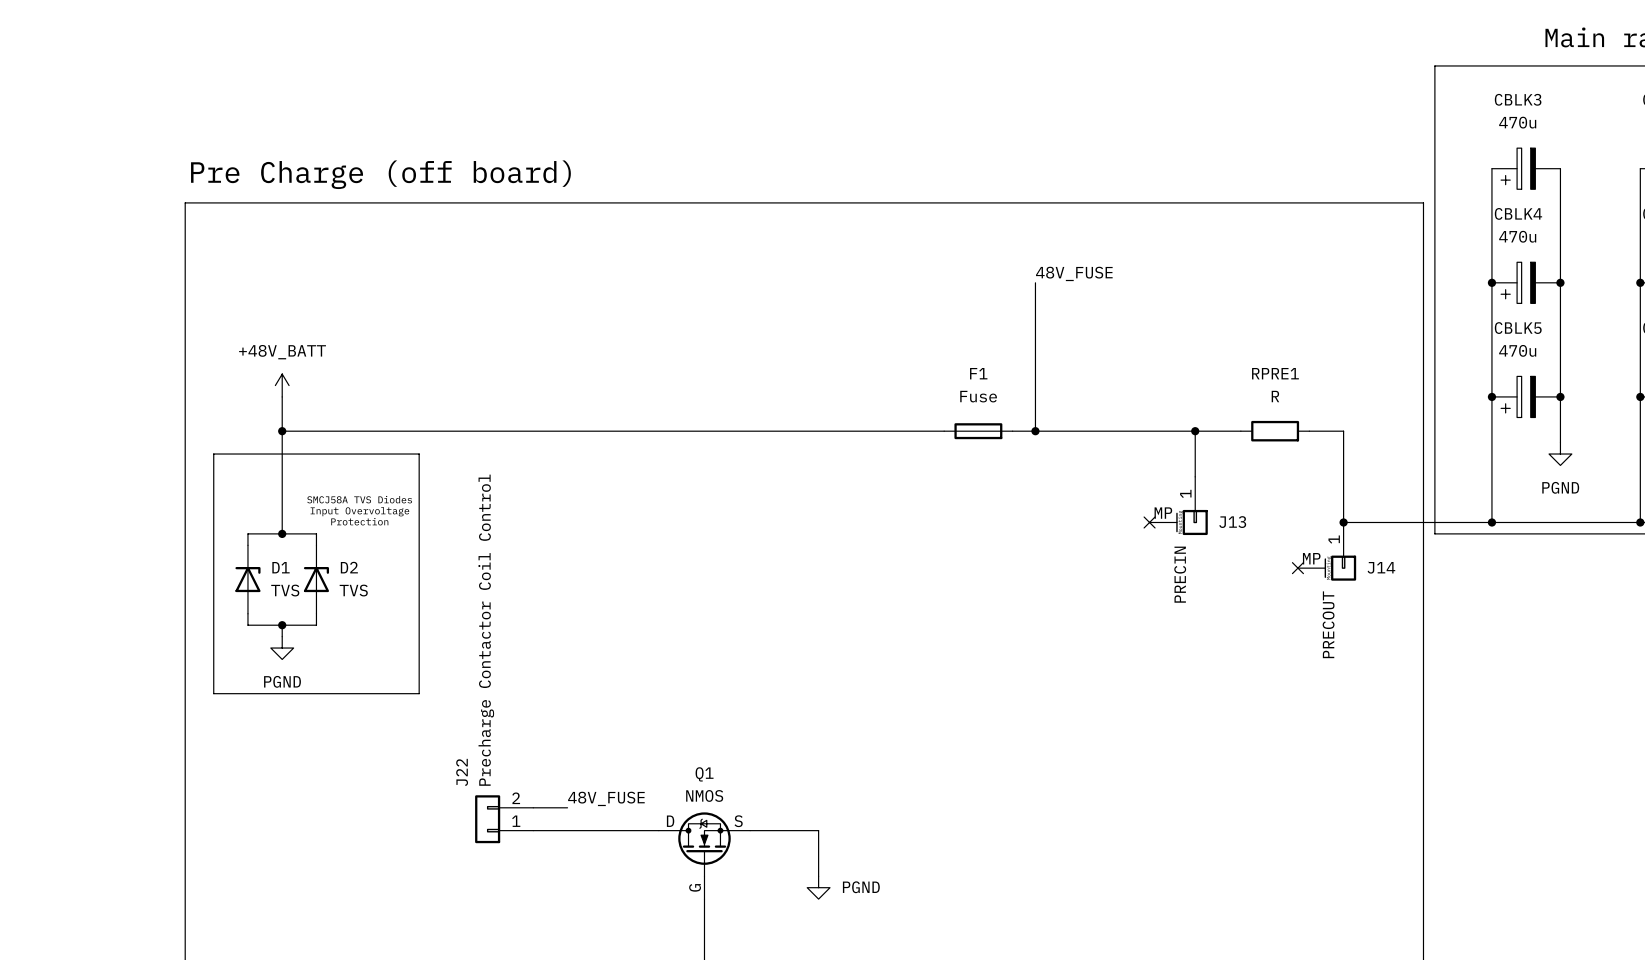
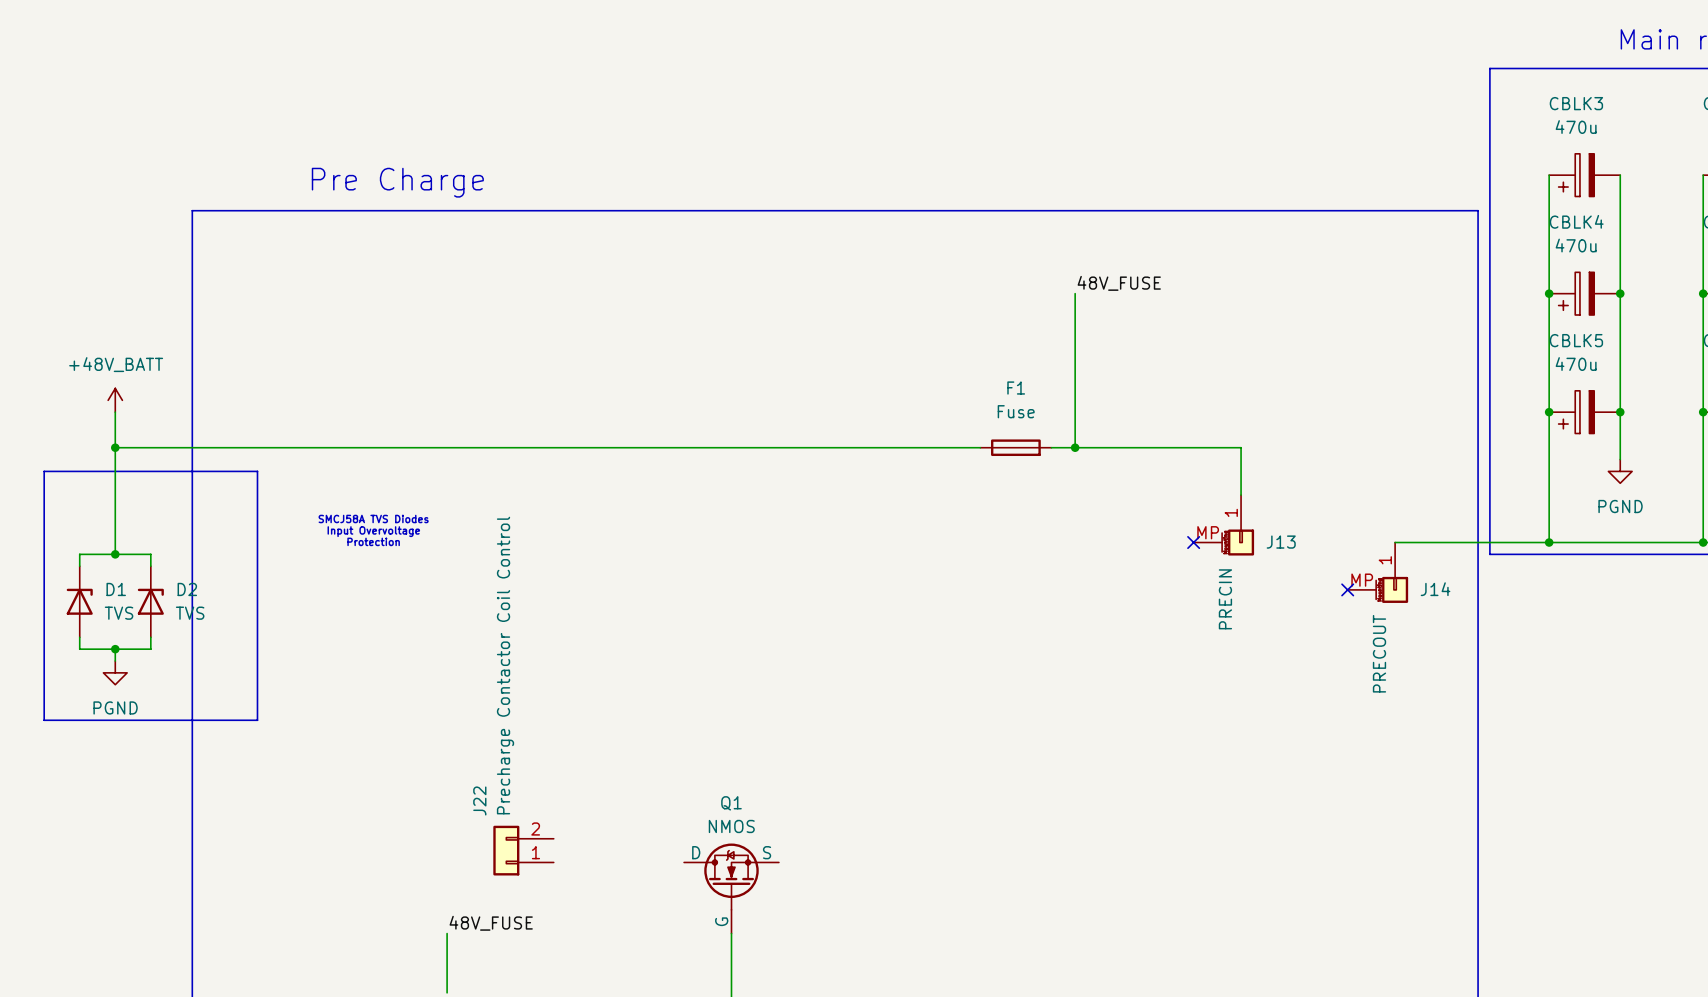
text: Pre Charge (off board) (380, 174) -> Pre Charge (397, 182)
power symbol position: +48V_BATT (282, 385) -> +48V_BATT (115, 400)
wire: (282, 396) (282, 533) -> (115, 412) (115, 554)
wire: none -> (115, 447) (293, 447)
junction: none -> (115, 447)
junction: (282, 431) -> none
wire: (1195, 431) (1240, 431) -> none
junction: (1195, 431) -> none
RPRE1: R (1275, 431) -> none
wire: (1309, 431) (1343, 431) (1343, 522) -> none
line: (213, 454) (213, 693) -> (221, 471) (44, 471) (44, 720) (221, 720)
line: (247, 454) (419, 454) (419, 693) (247, 693) -> (257, 471) (257, 720)
junction: (1343, 522) -> none
junction: none -> (115, 554)
junction: (282, 533) -> none
wire: (247, 545) (247, 533) (316, 533) (316, 545) -> (79, 566) (79, 554) (150, 554) (150, 566)
D1 position: (247, 579) -> (79, 601)
D2 position: (316, 579) -> (150, 601)
wire: (247, 613) (247, 625) (316, 625) (316, 613) -> (79, 637) (79, 649) (150, 649) (150, 637)
junction: none -> (115, 649)
wire: (282, 625) (282, 636) -> (115, 649) (115, 661)
junction: (282, 625) -> none
power symbol position: PGND (282, 648) -> PGND (115, 672)
label position: 48V_FUSE (606, 798) -> 48V_FUSE (491, 923)
wire: (533, 807) (567, 807) -> none
wire: (533, 830) (658, 830) -> none
wire: (750, 830) (818, 830) (818, 876) -> none
power symbol: PGND (818, 887) -> none
wire: none -> (447, 933) (447, 992)

